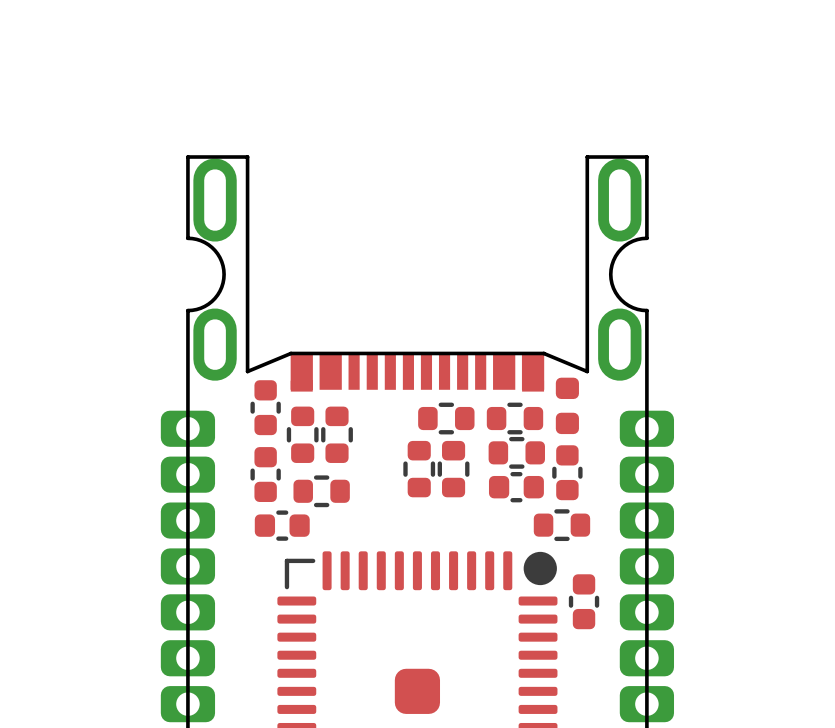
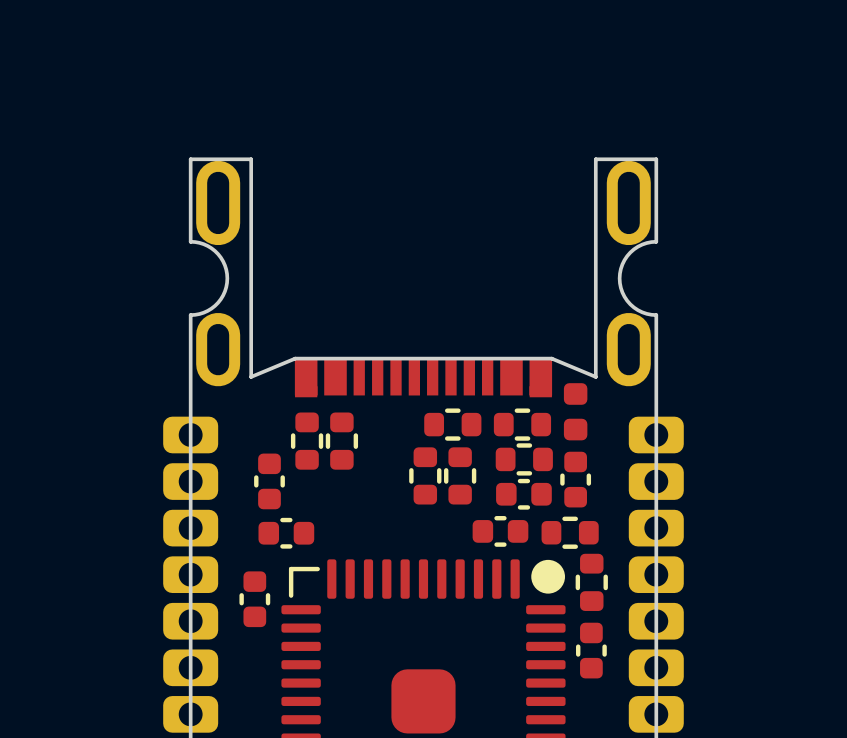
part: (265, 407) -> none
part rotation: 0° (321, 491) -> 90° clockwise (591, 582)
part position: (321, 491) -> (591, 582)
part: none -> (500, 531)
part: none -> (254, 599)
part position: (584, 601) -> (591, 650)
part footprint: [394, 668, 441, 714] -> [391, 669, 456, 734]

